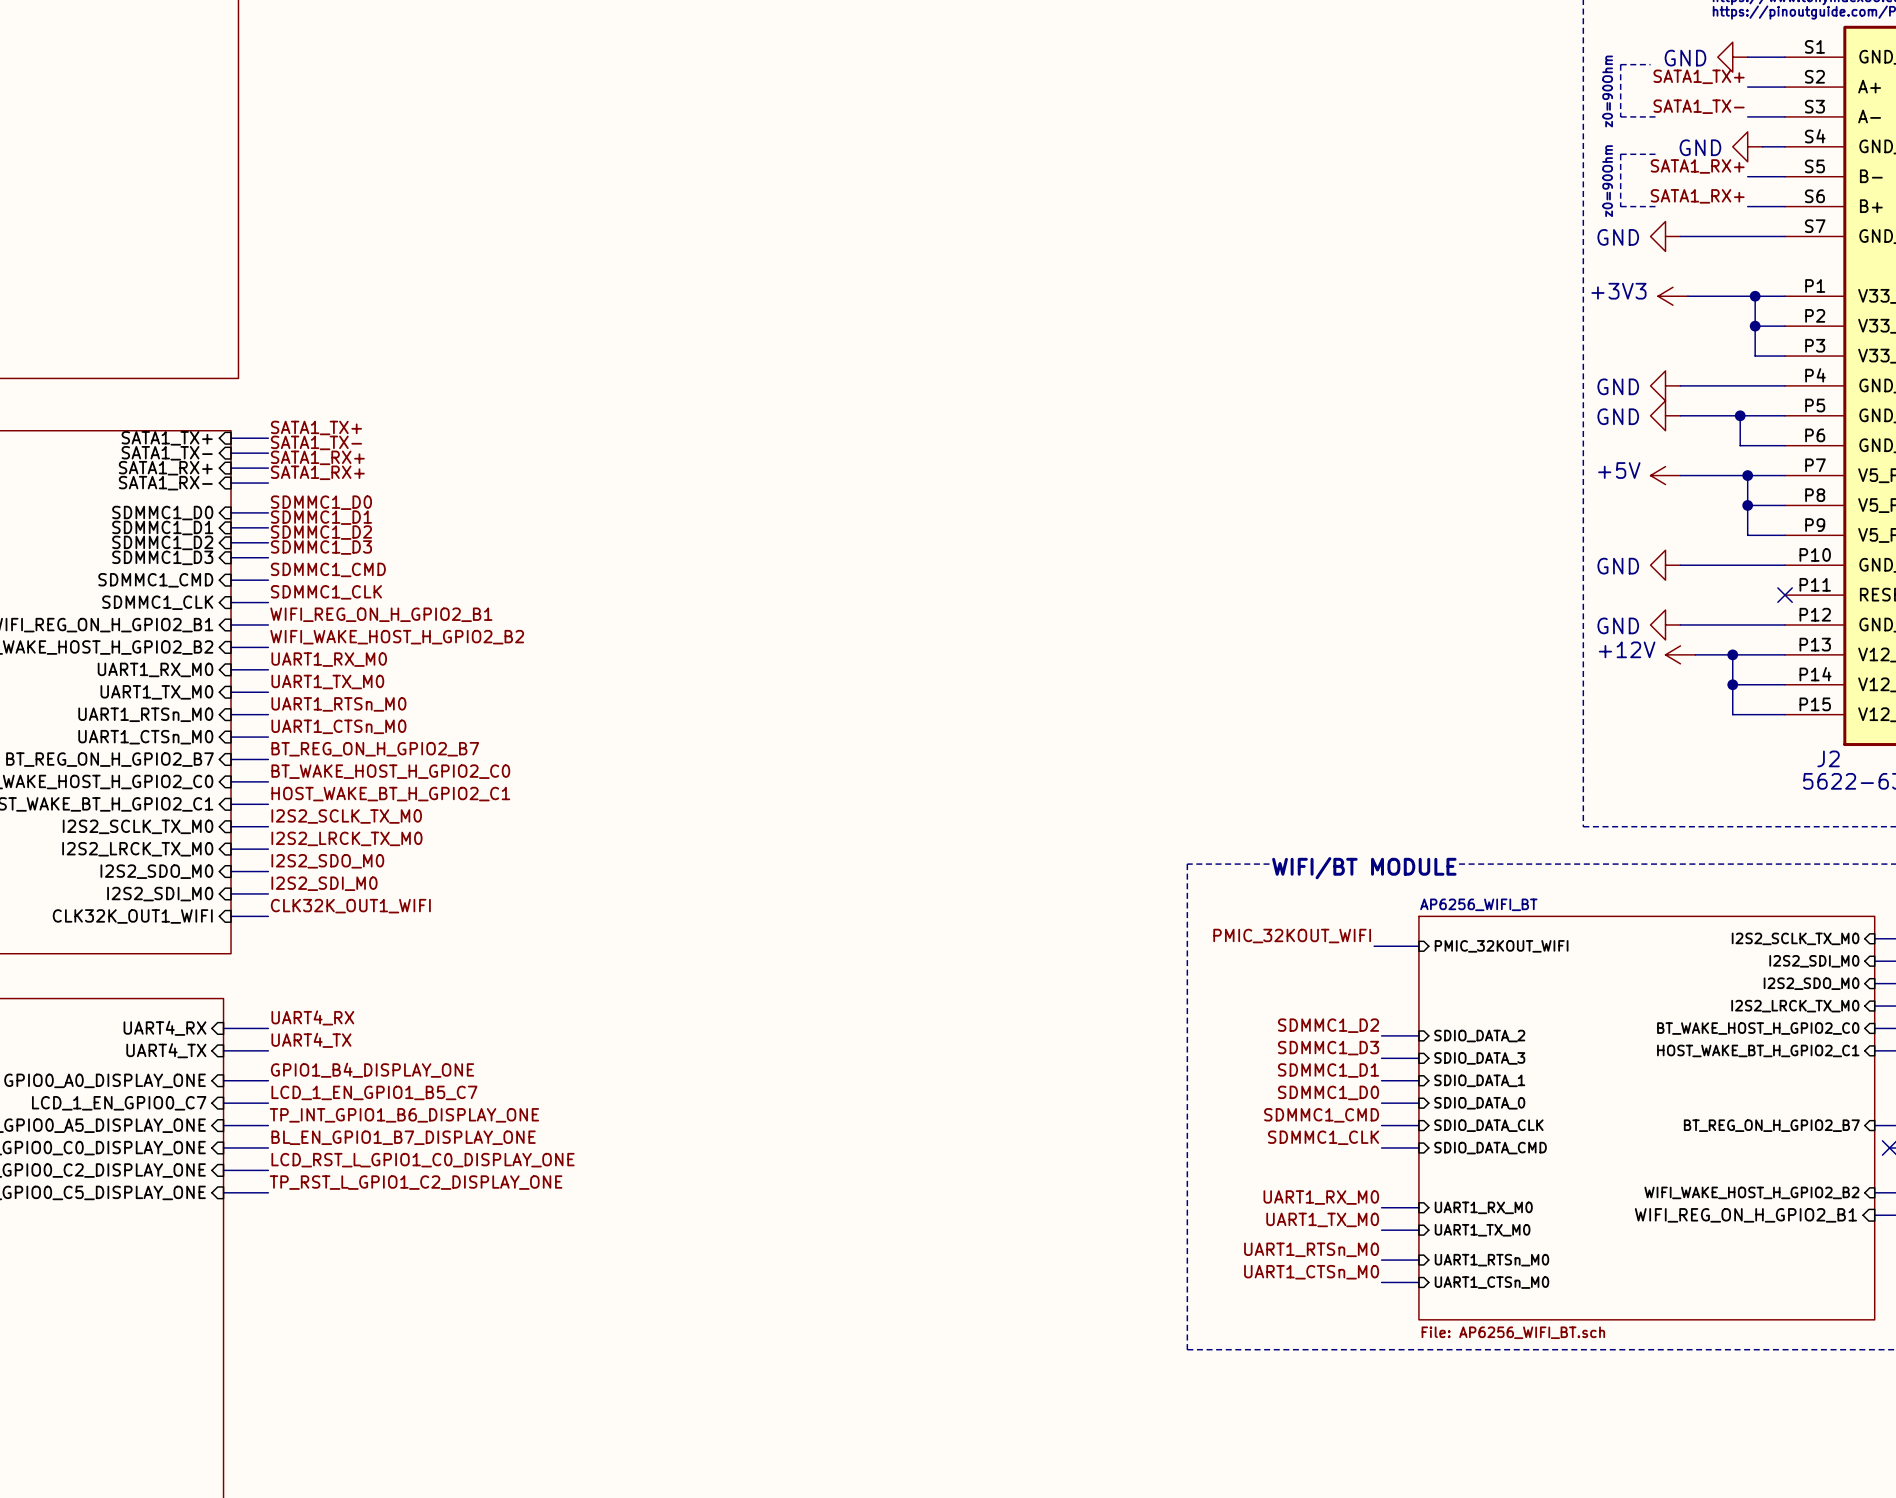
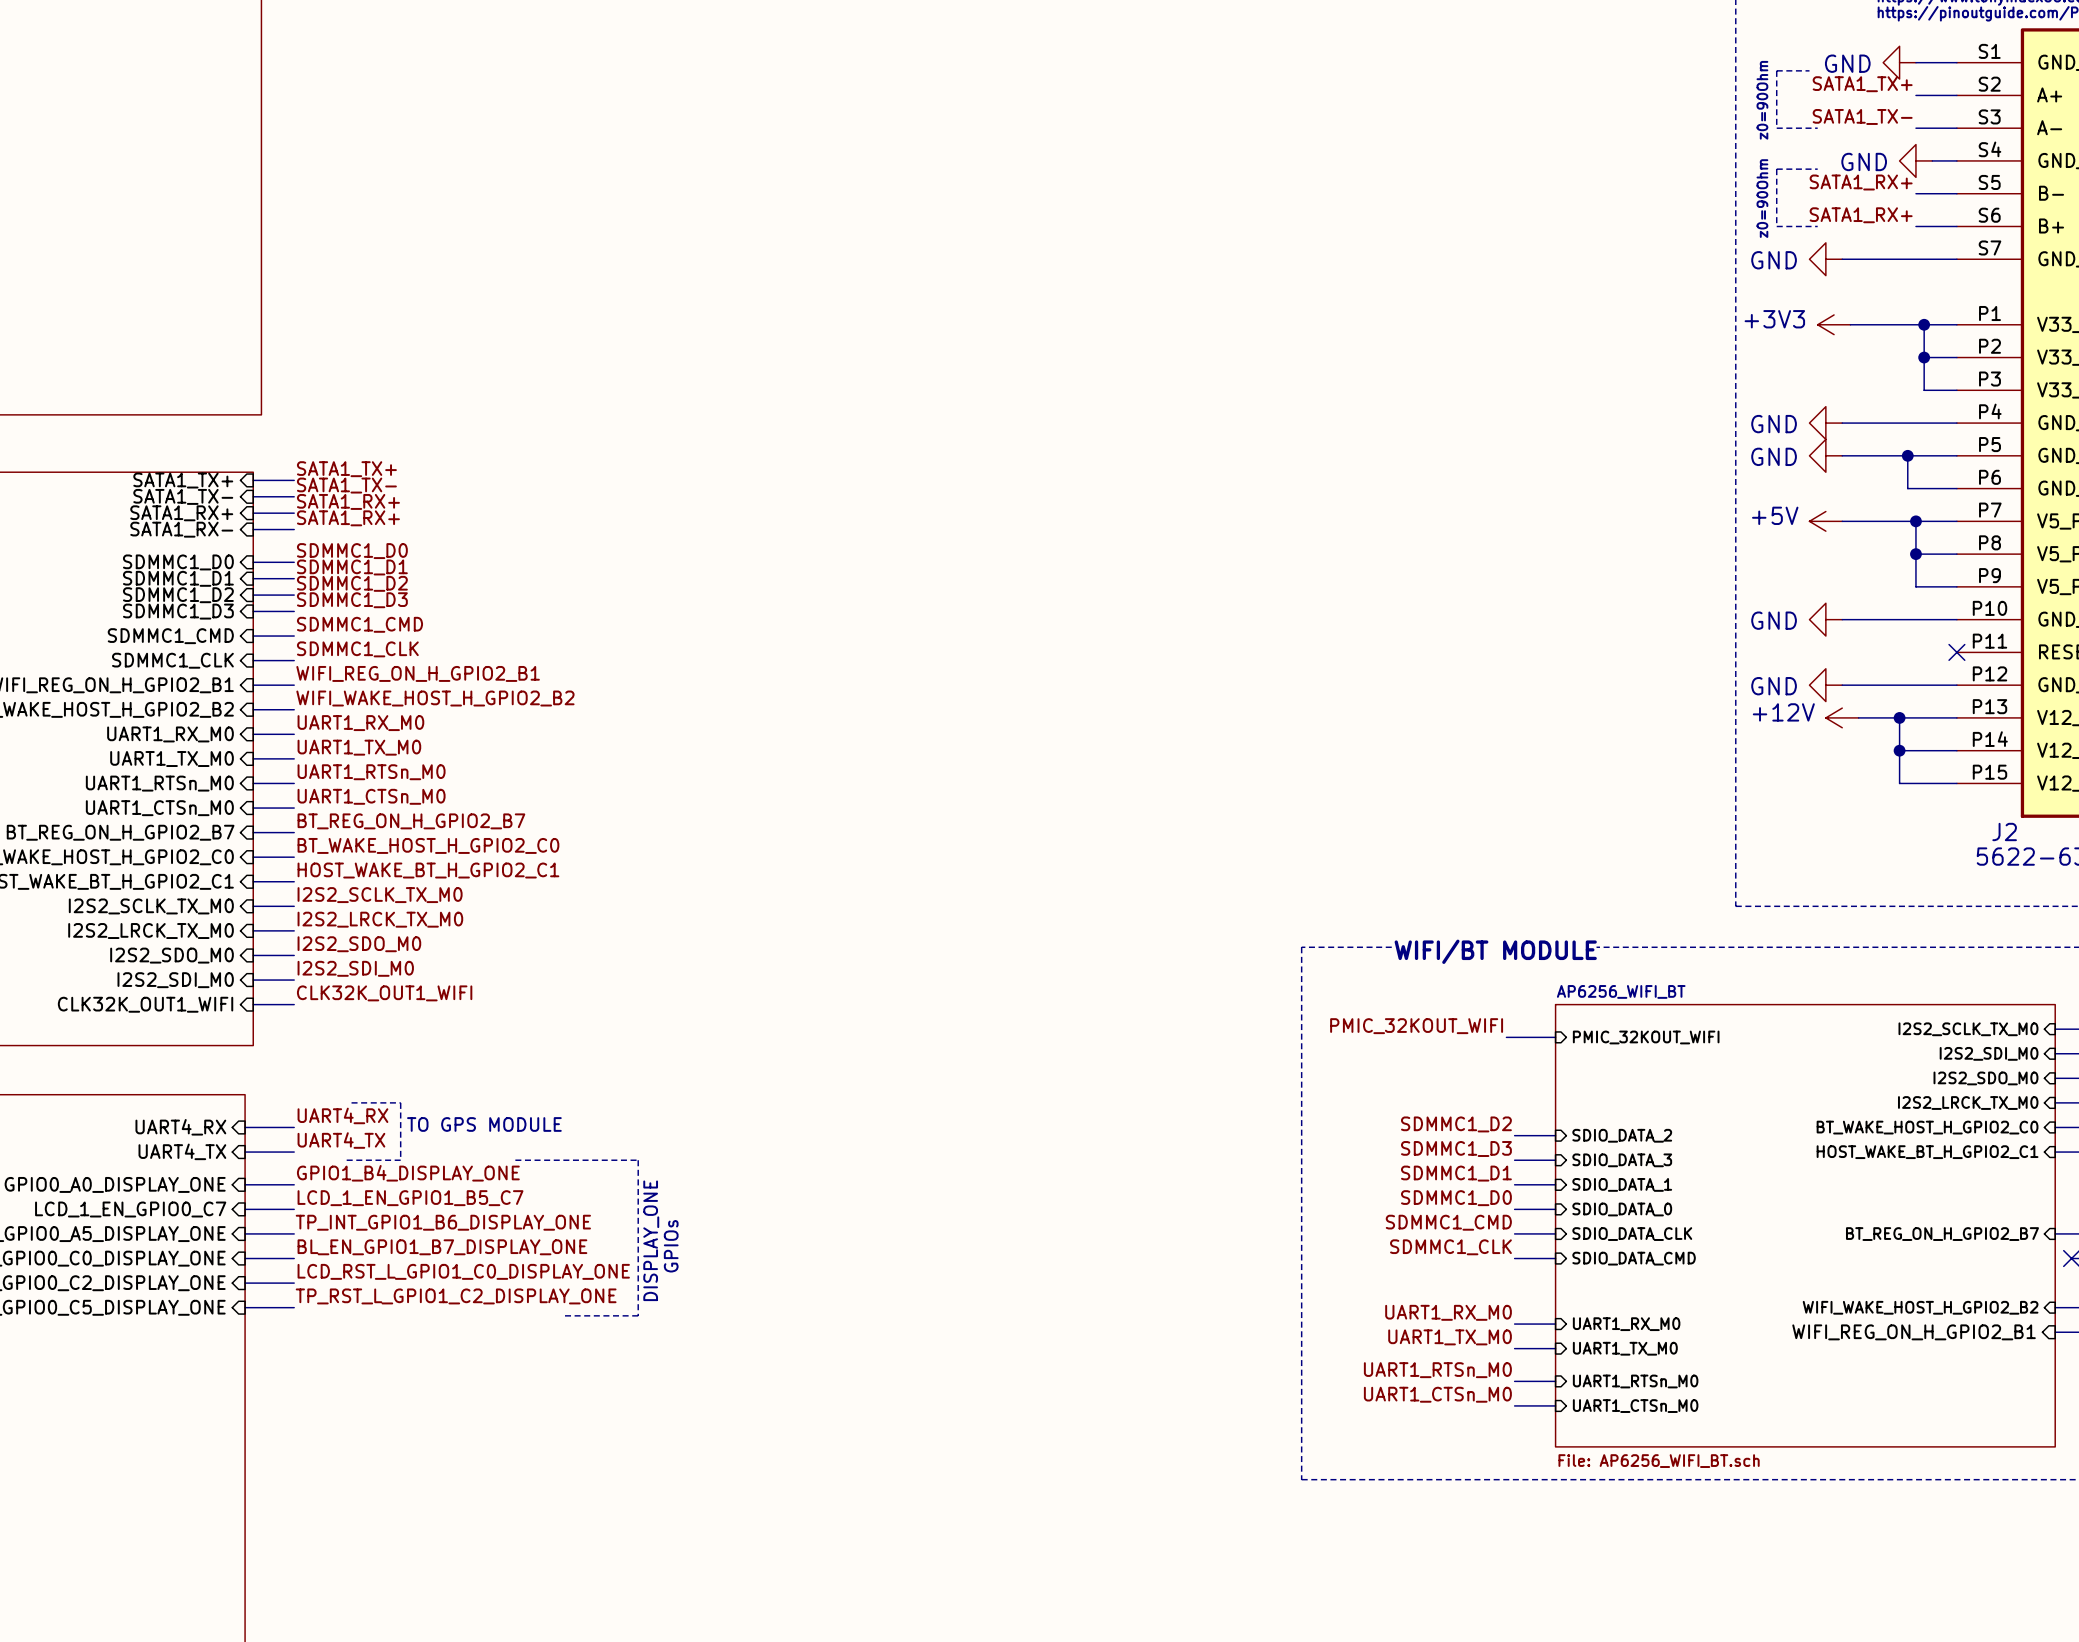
line: none -> (351, 1102) (400, 1102) (400, 1160) (343, 1160)
text: none -> TO GPS MODULE (484, 1124)
line: none -> (515, 1160) (638, 1160) (638, 1315) (564, 1315)
text: none -> DISPLAY_ONE (651, 1240)
text: none -> GPIOs (671, 1246)

